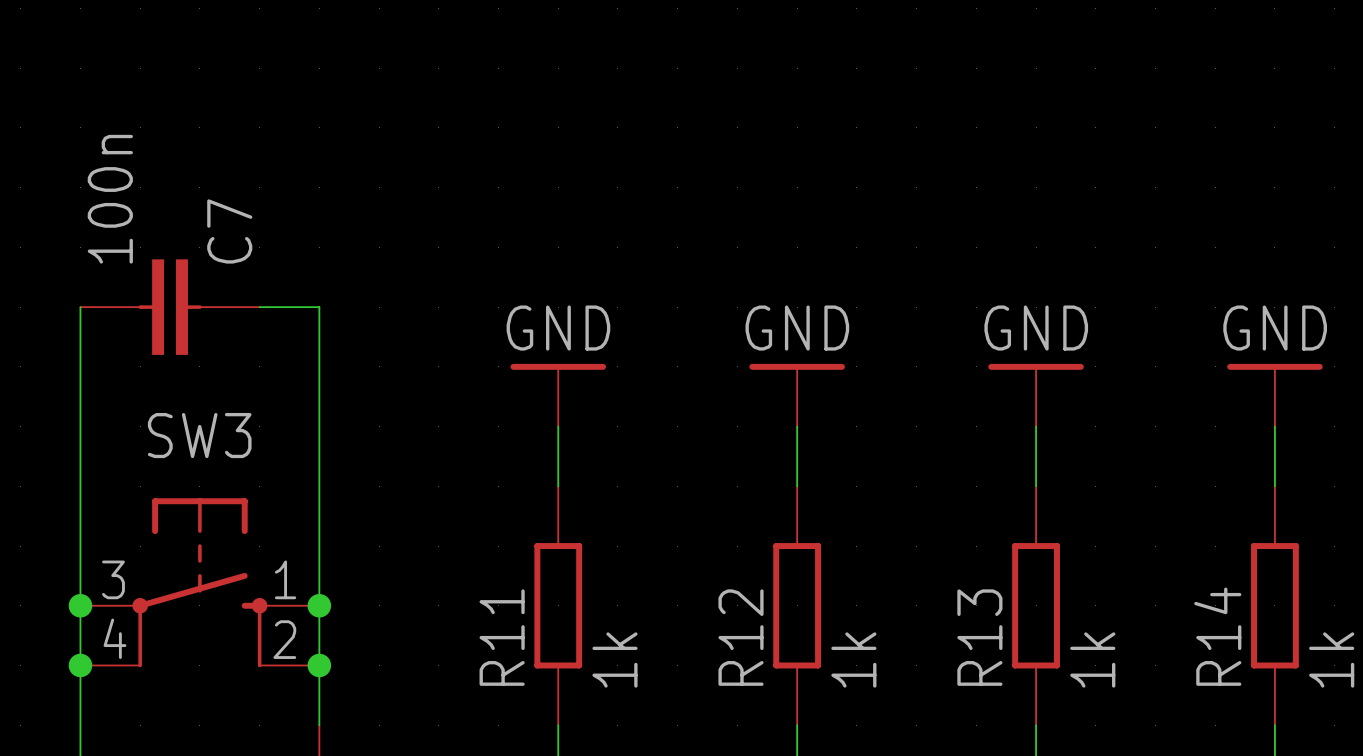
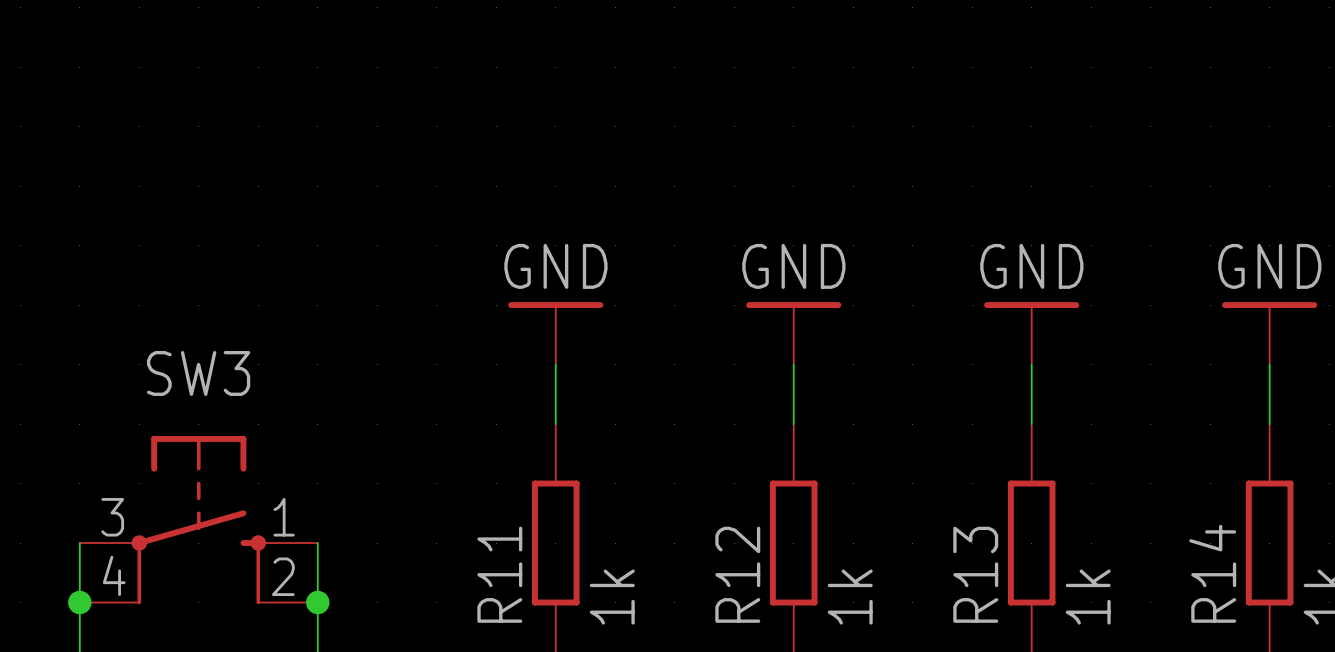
wire: (80, 307) (80, 605) -> none
C7: 100n (170, 307) -> none
wire: (259, 307) (319, 307) (319, 605) -> none
junction: (80, 605) -> none
junction: (319, 605) -> none

